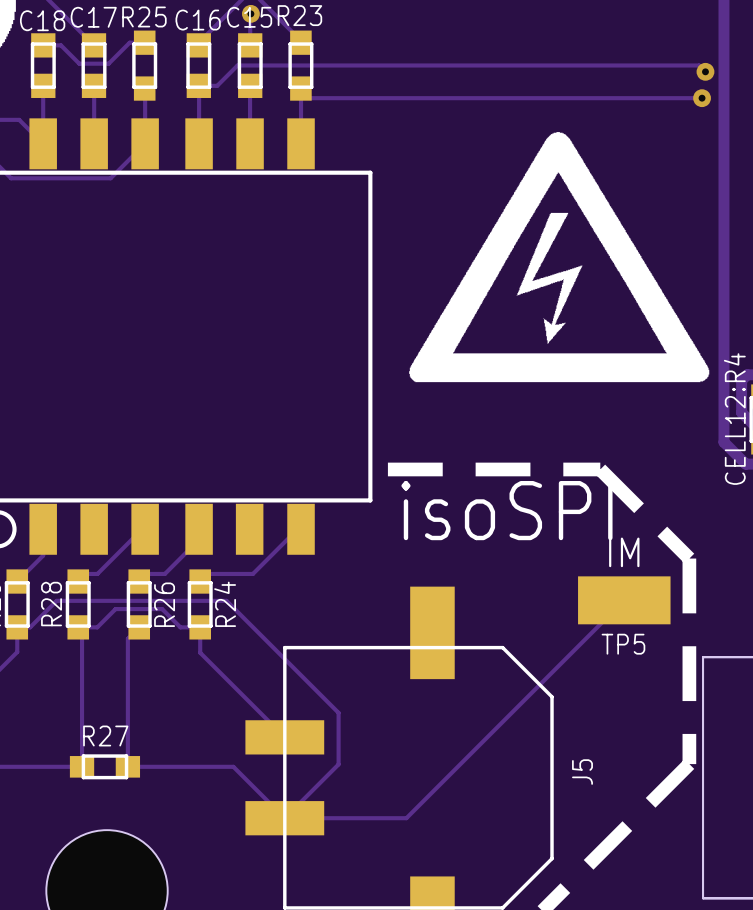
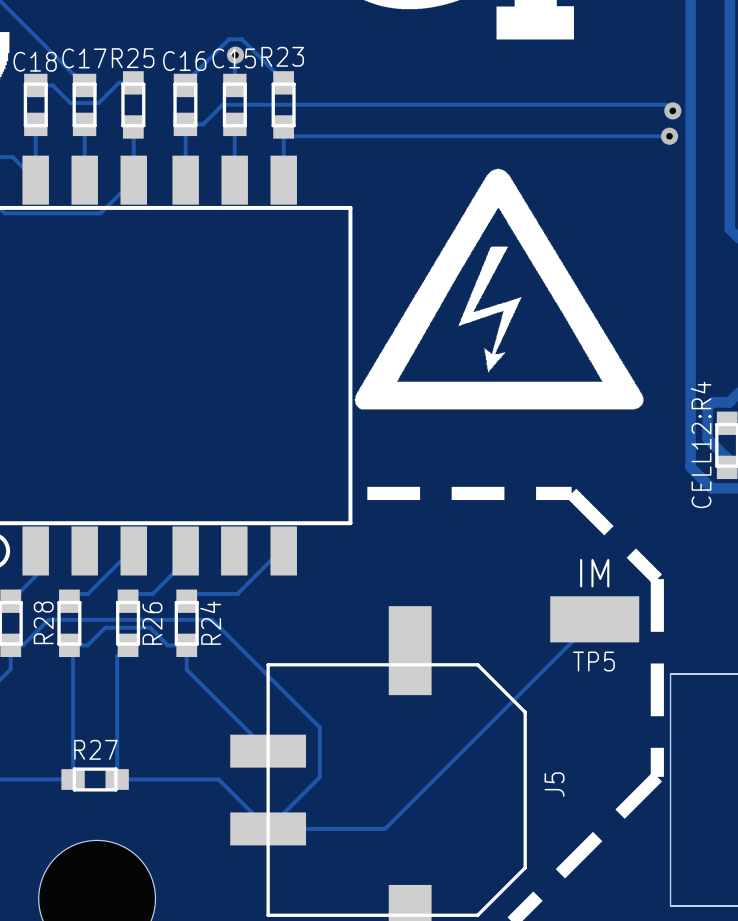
drawing position: (559, 257) -> (499, 289)
text: isoSPI (506, 510) -> none

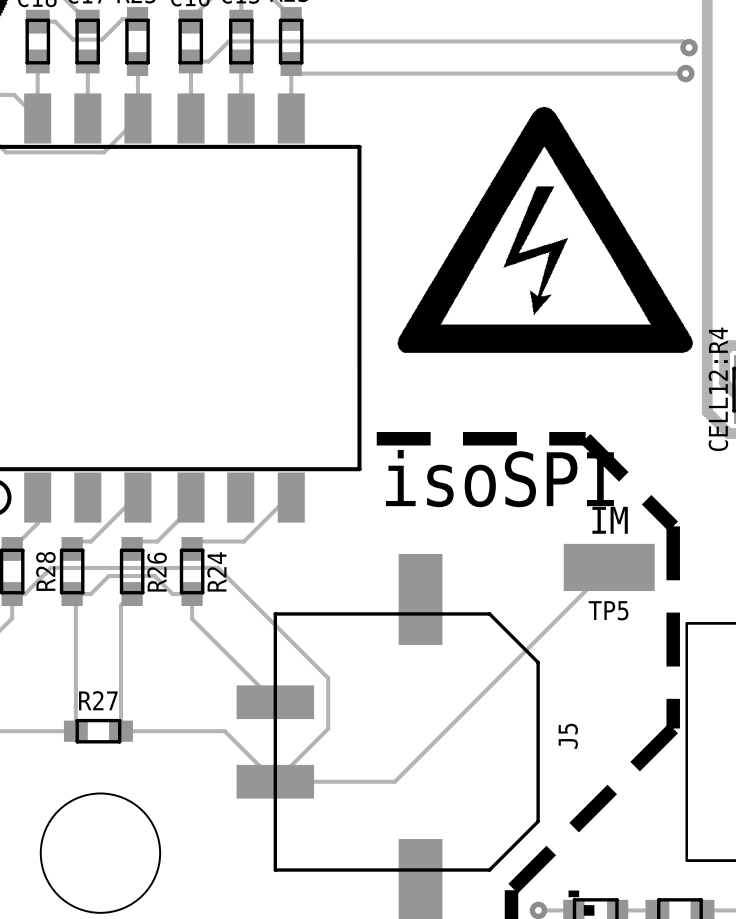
drawing position: (499, 289) -> (545, 229)
text: none -> isoSPI (499, 478)

